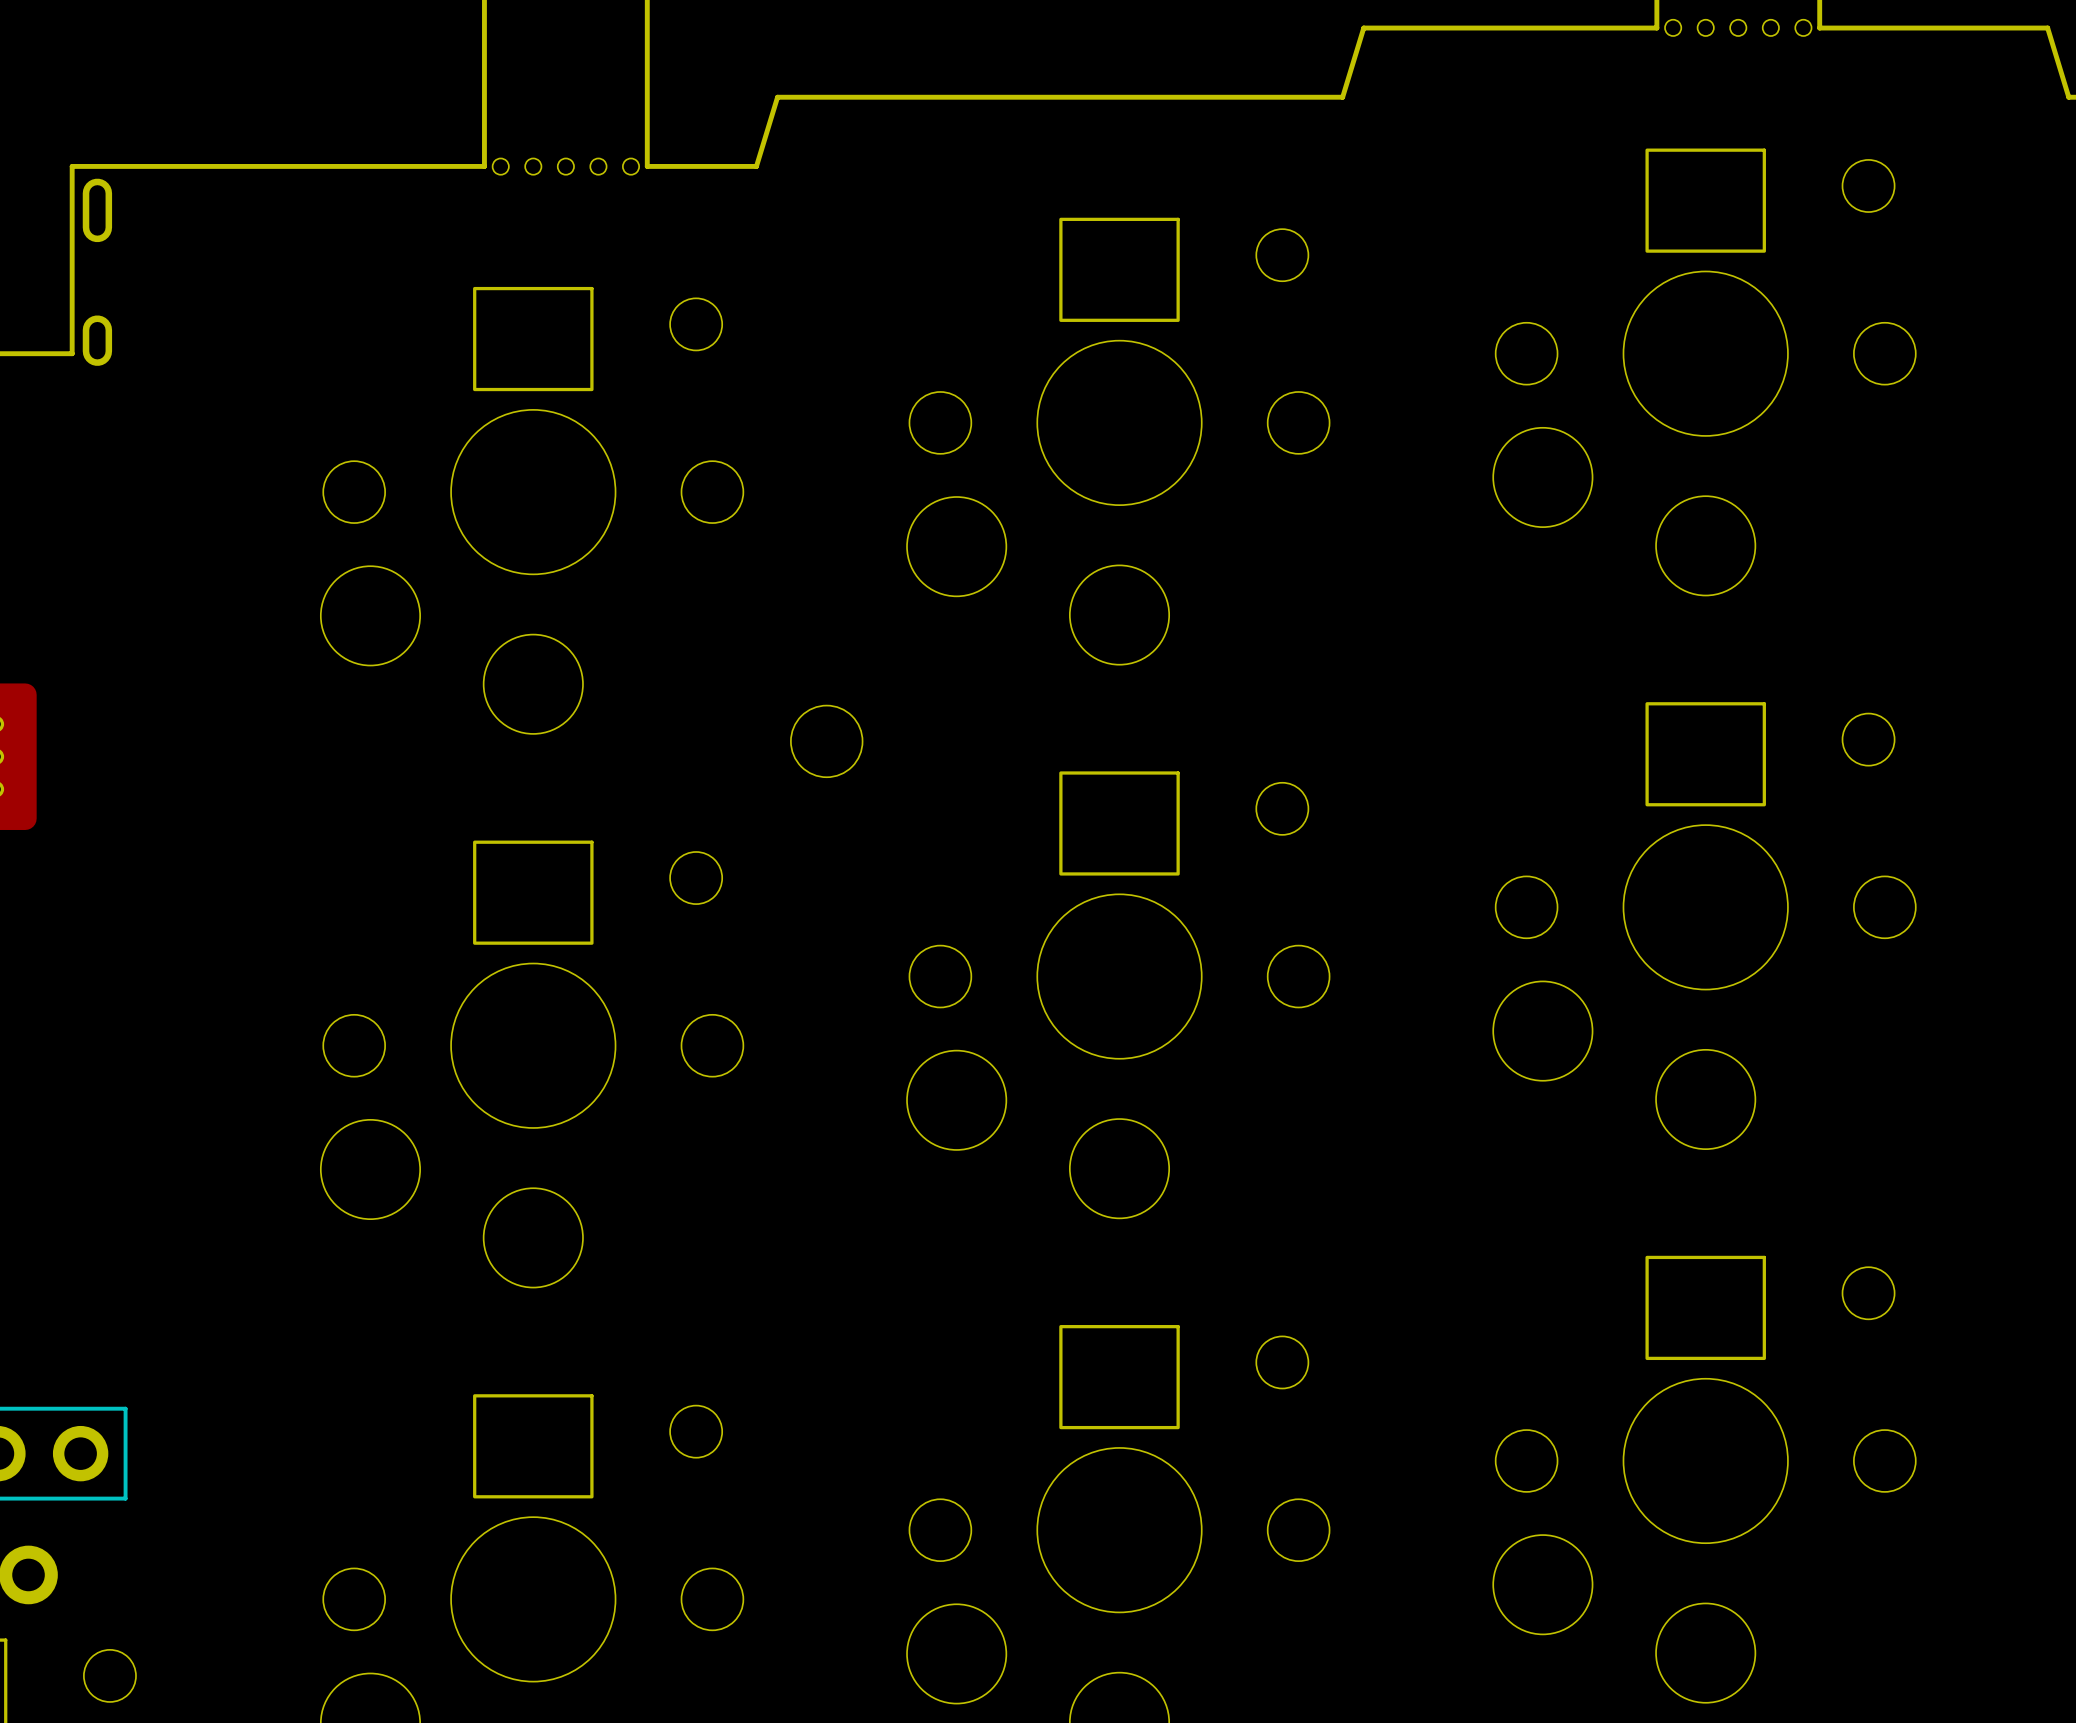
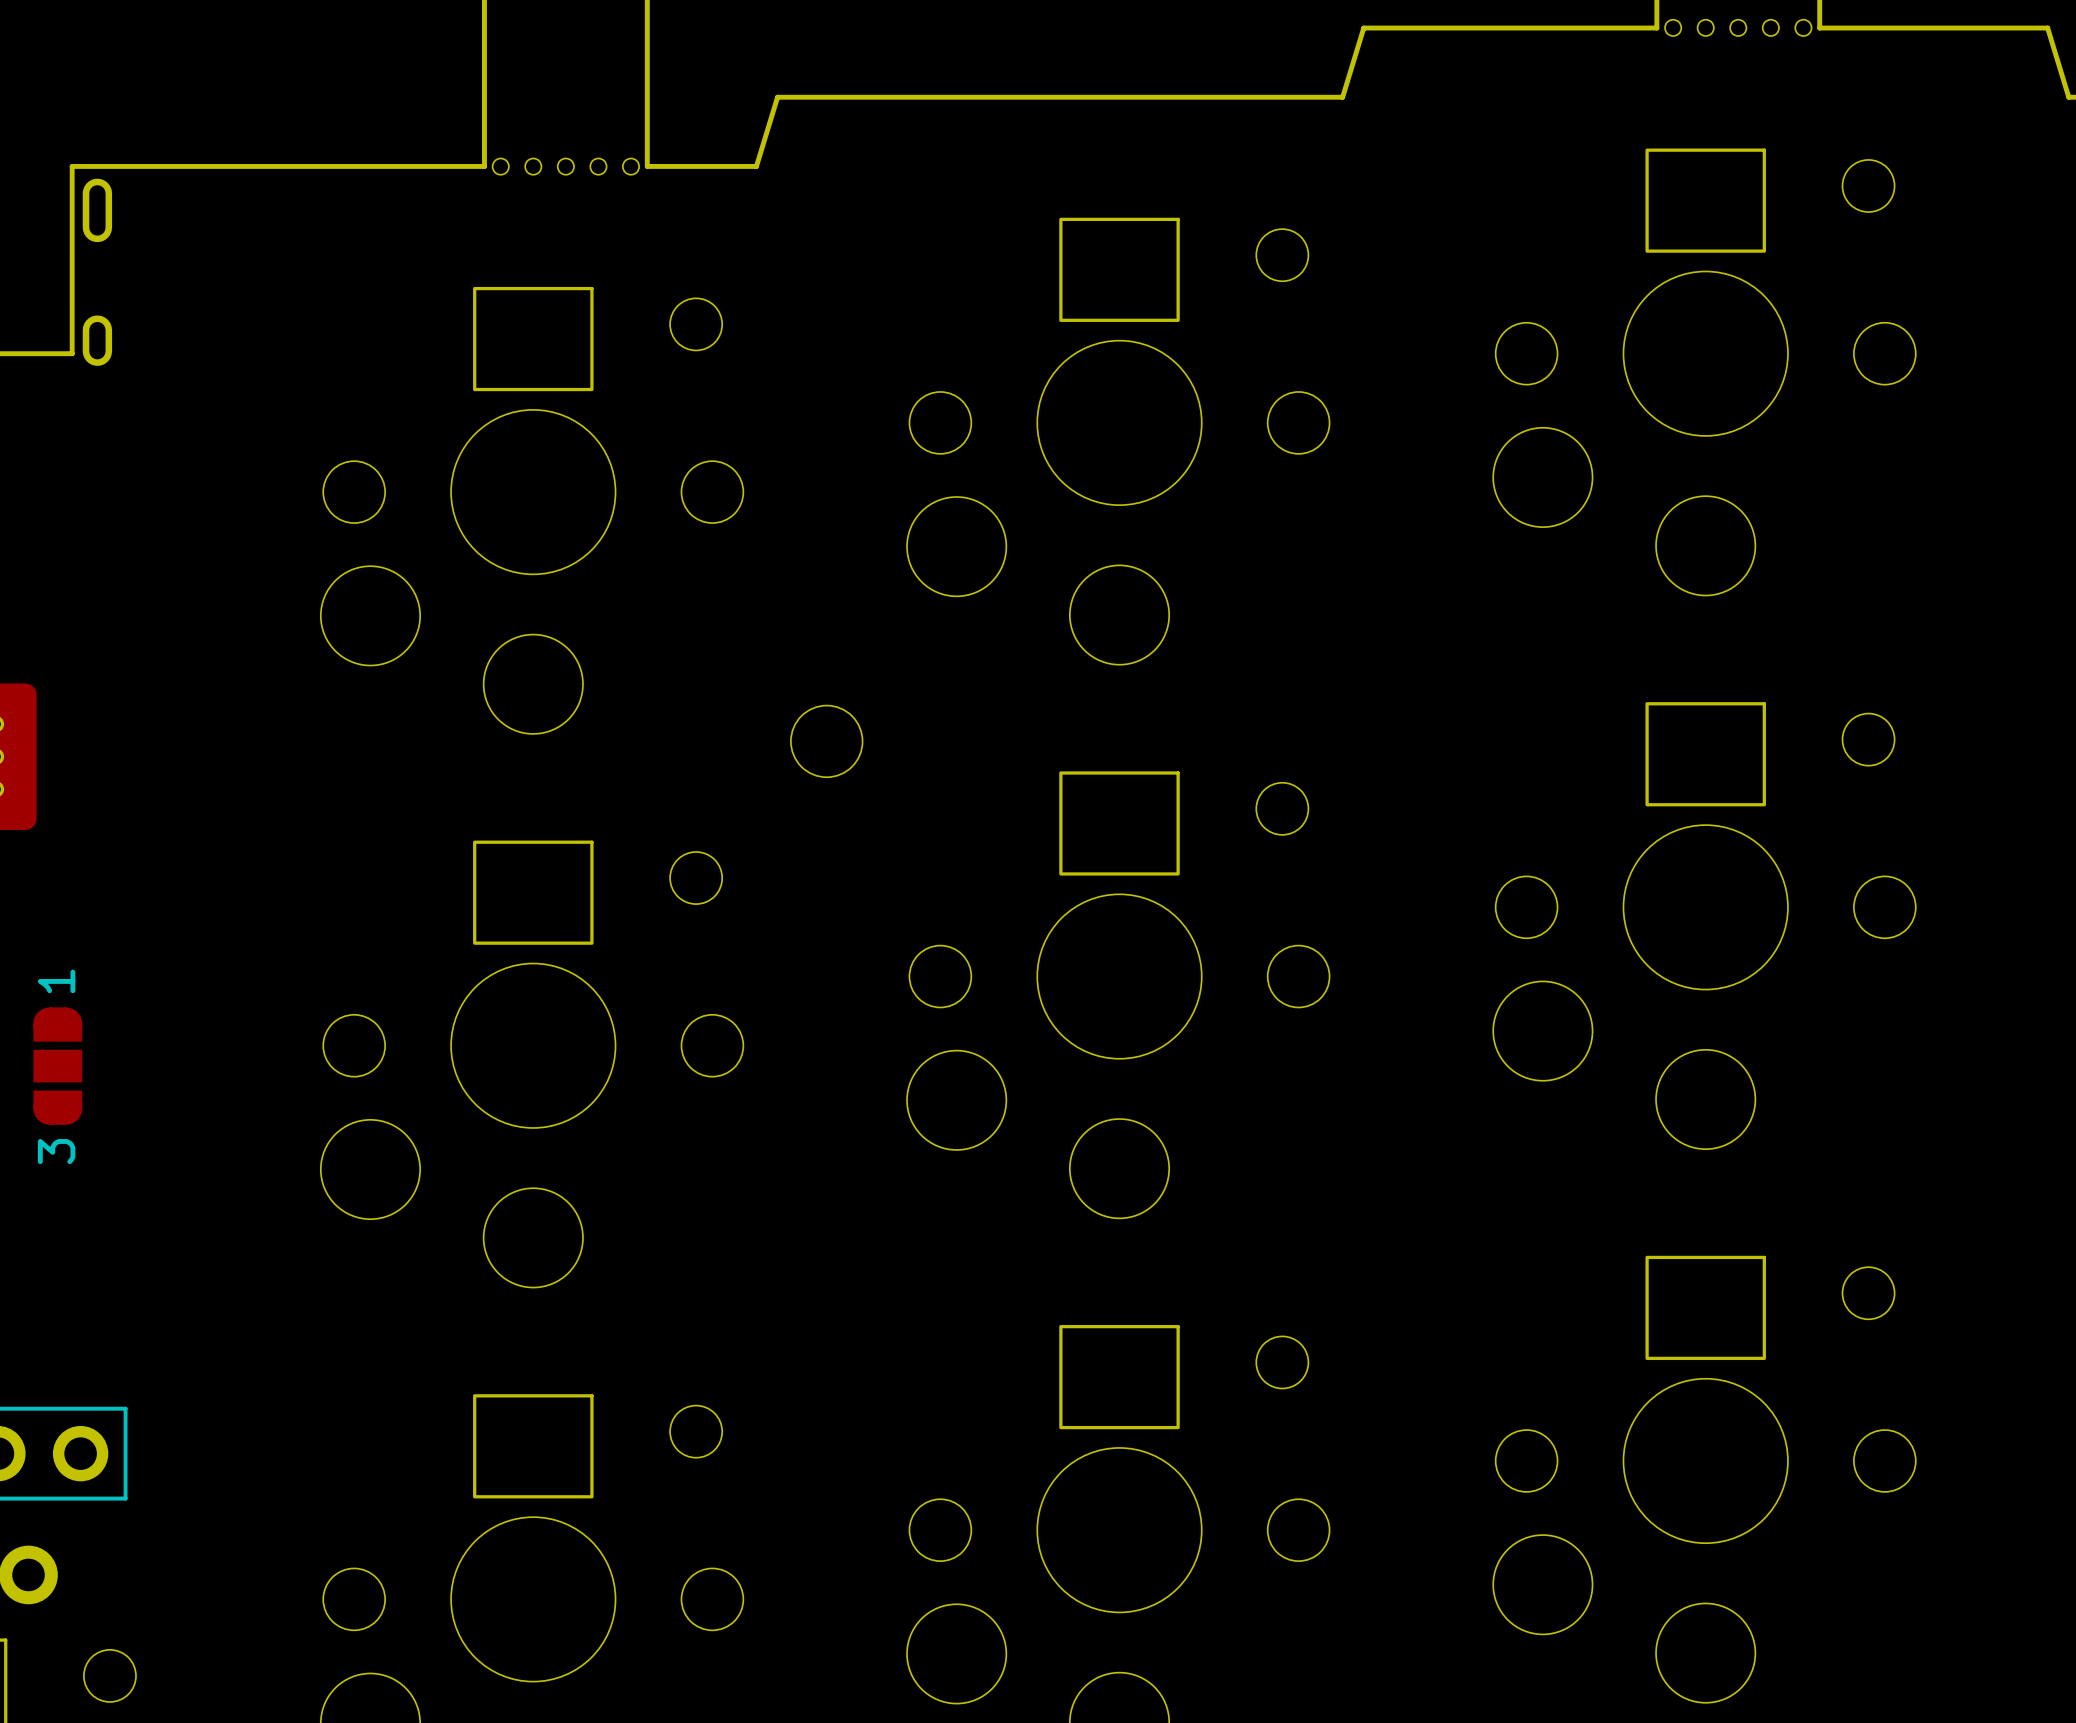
part: none -> (57, 1066)

